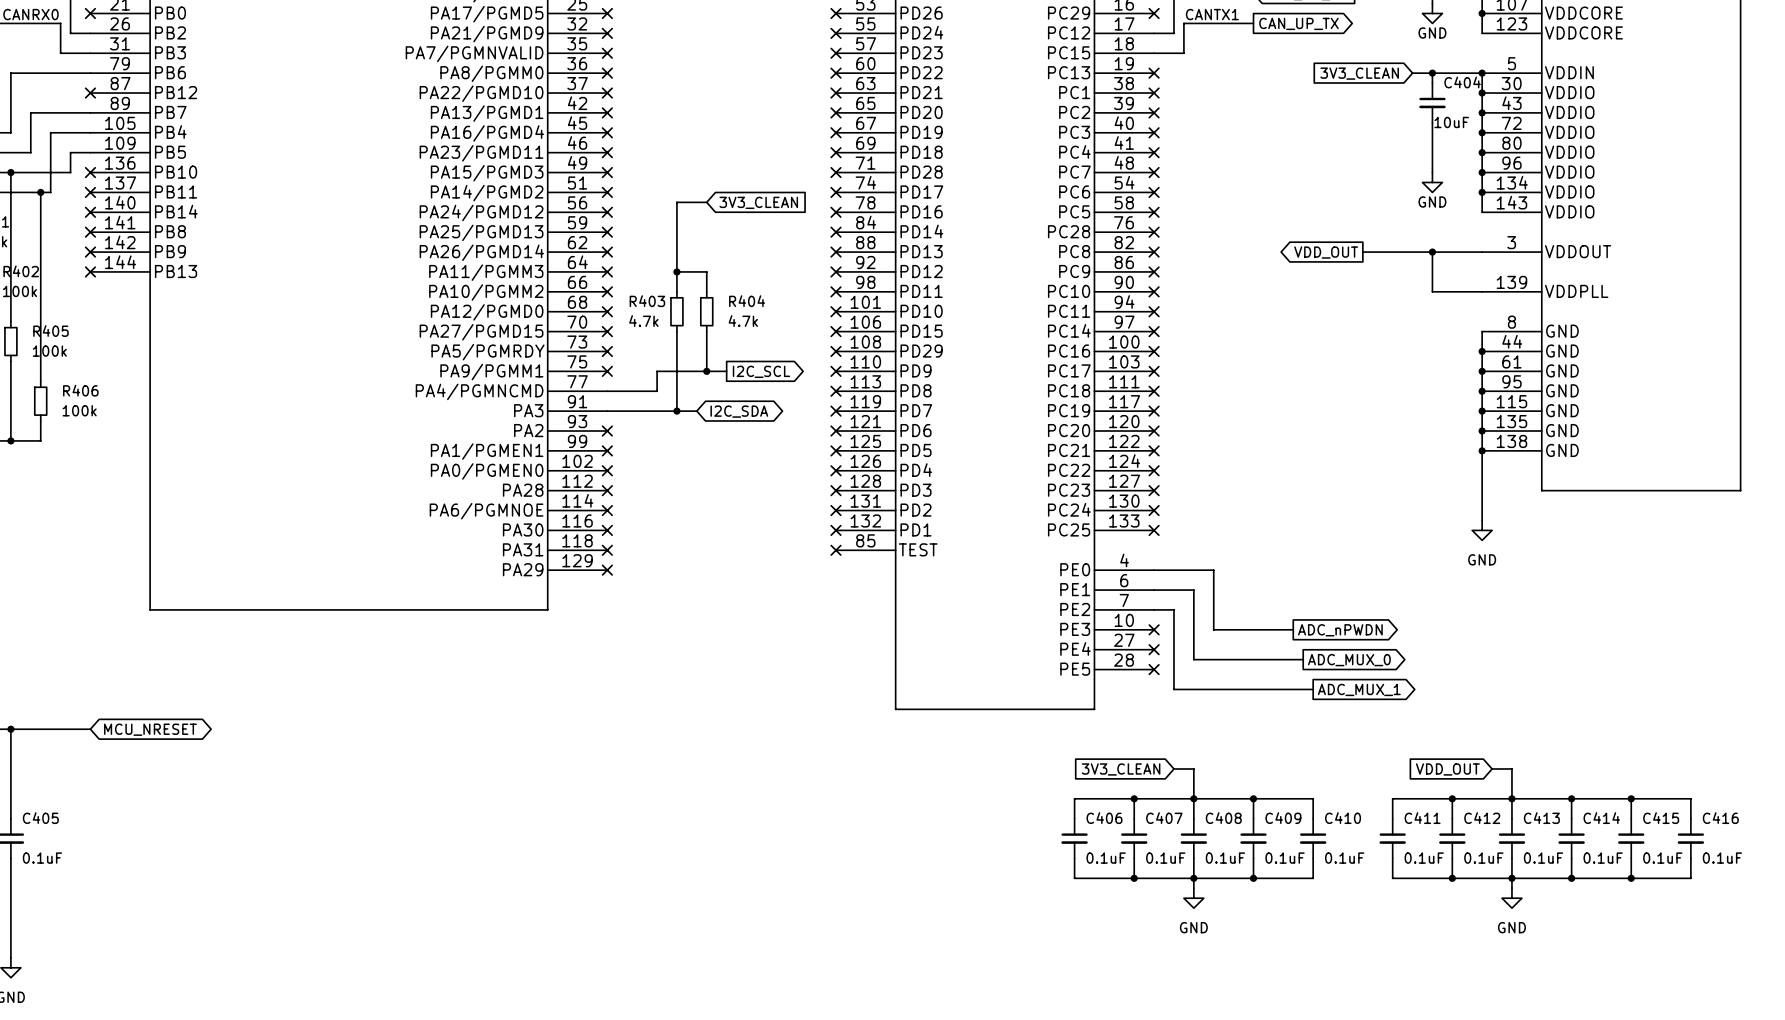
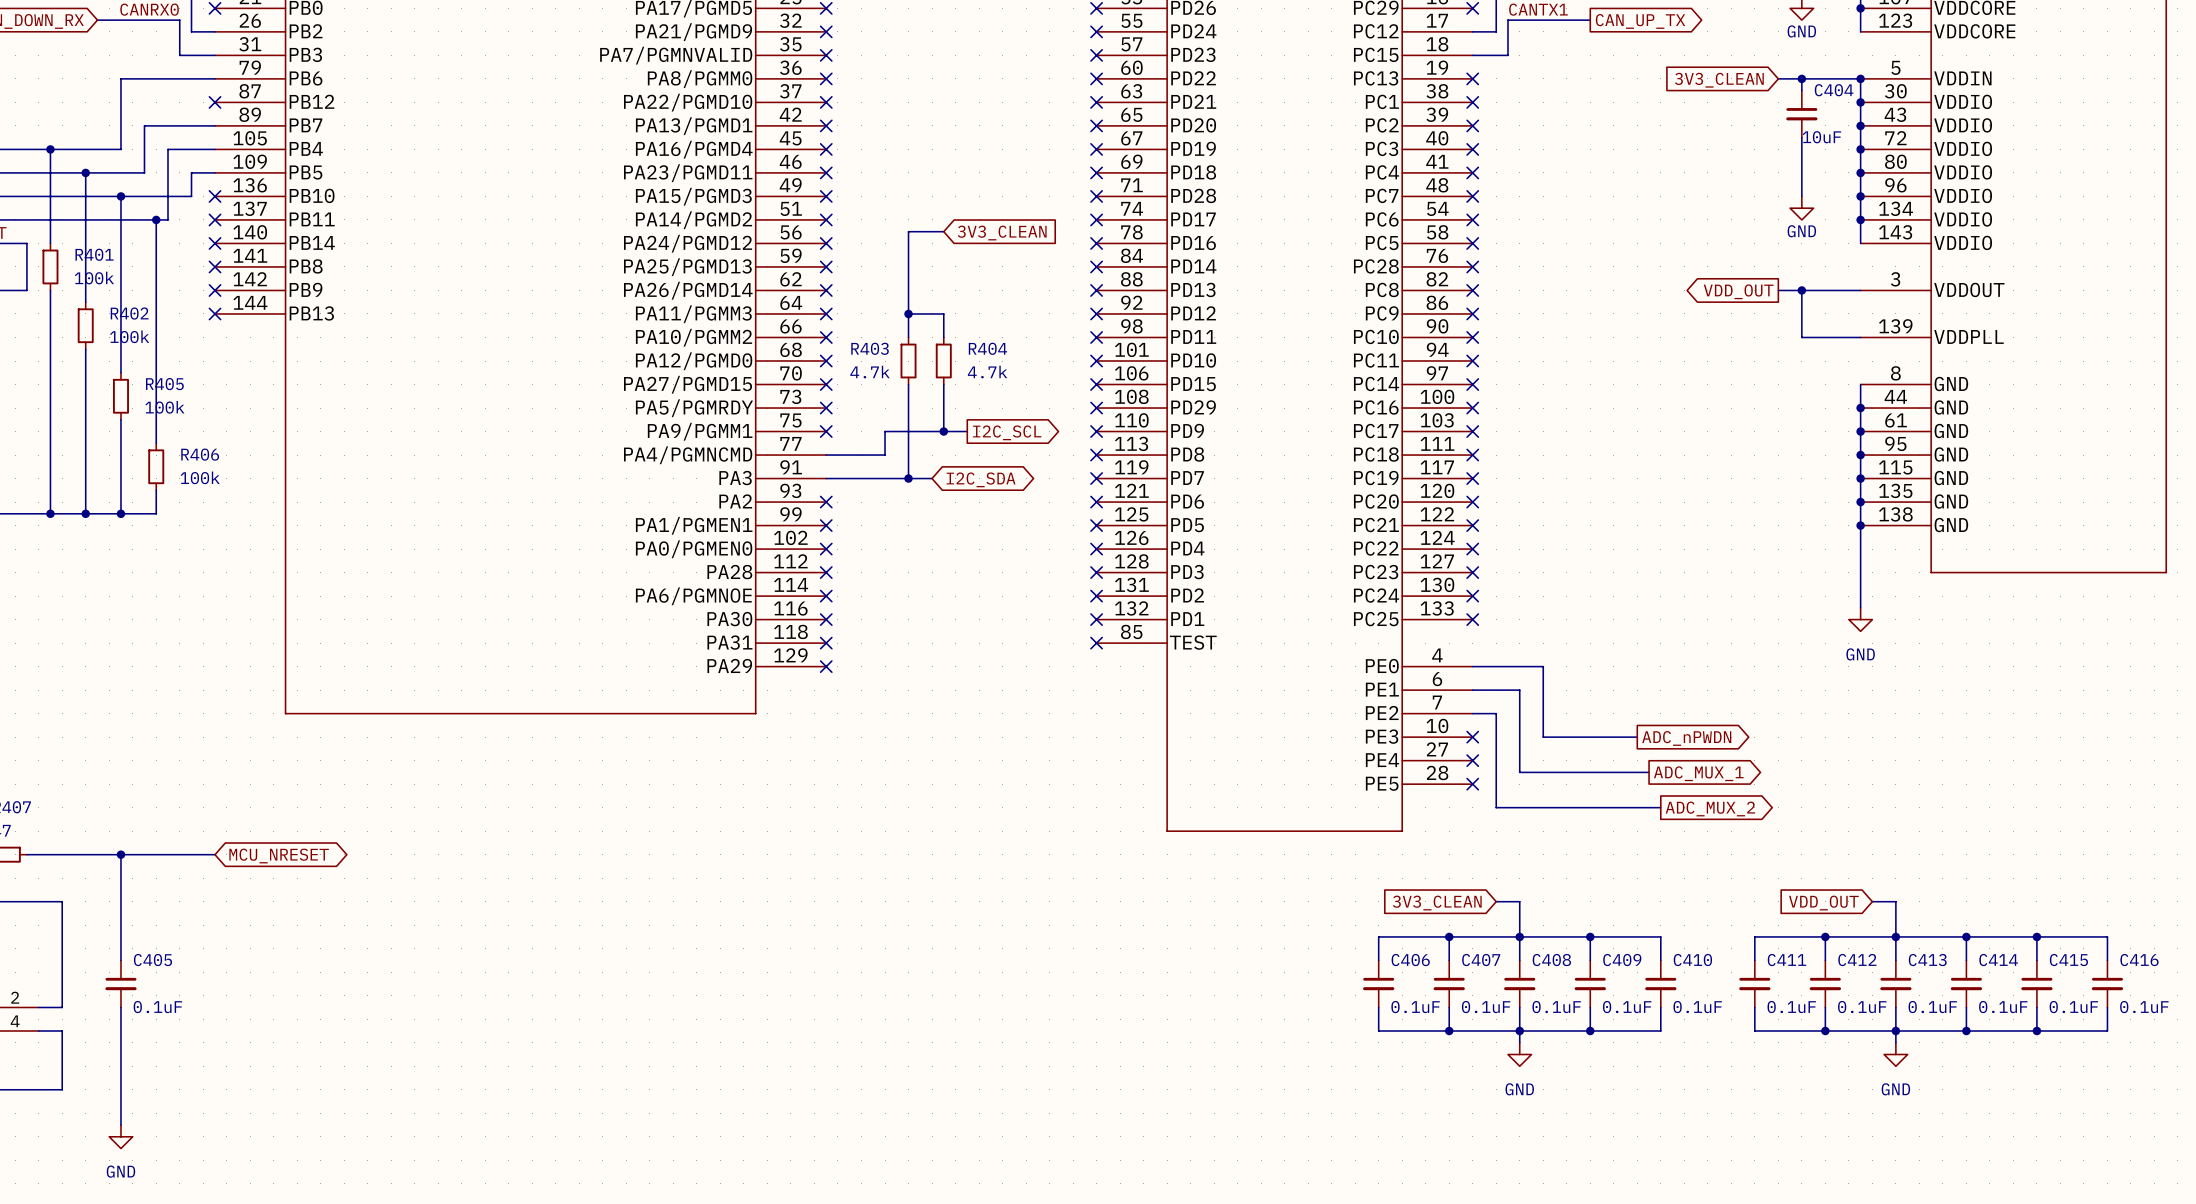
global label position: VDD_OUT (1326, 252) -> VDD_OUT (1738, 291)
wire: (1362, 252) (1412, 252) -> none
global label: ADC_MUX_0 (1349, 660) -> ADC_MUX_1 (1698, 773)
global label: ADC_MUX_1 (1359, 689) -> ADC_MUX_2 (1710, 808)

